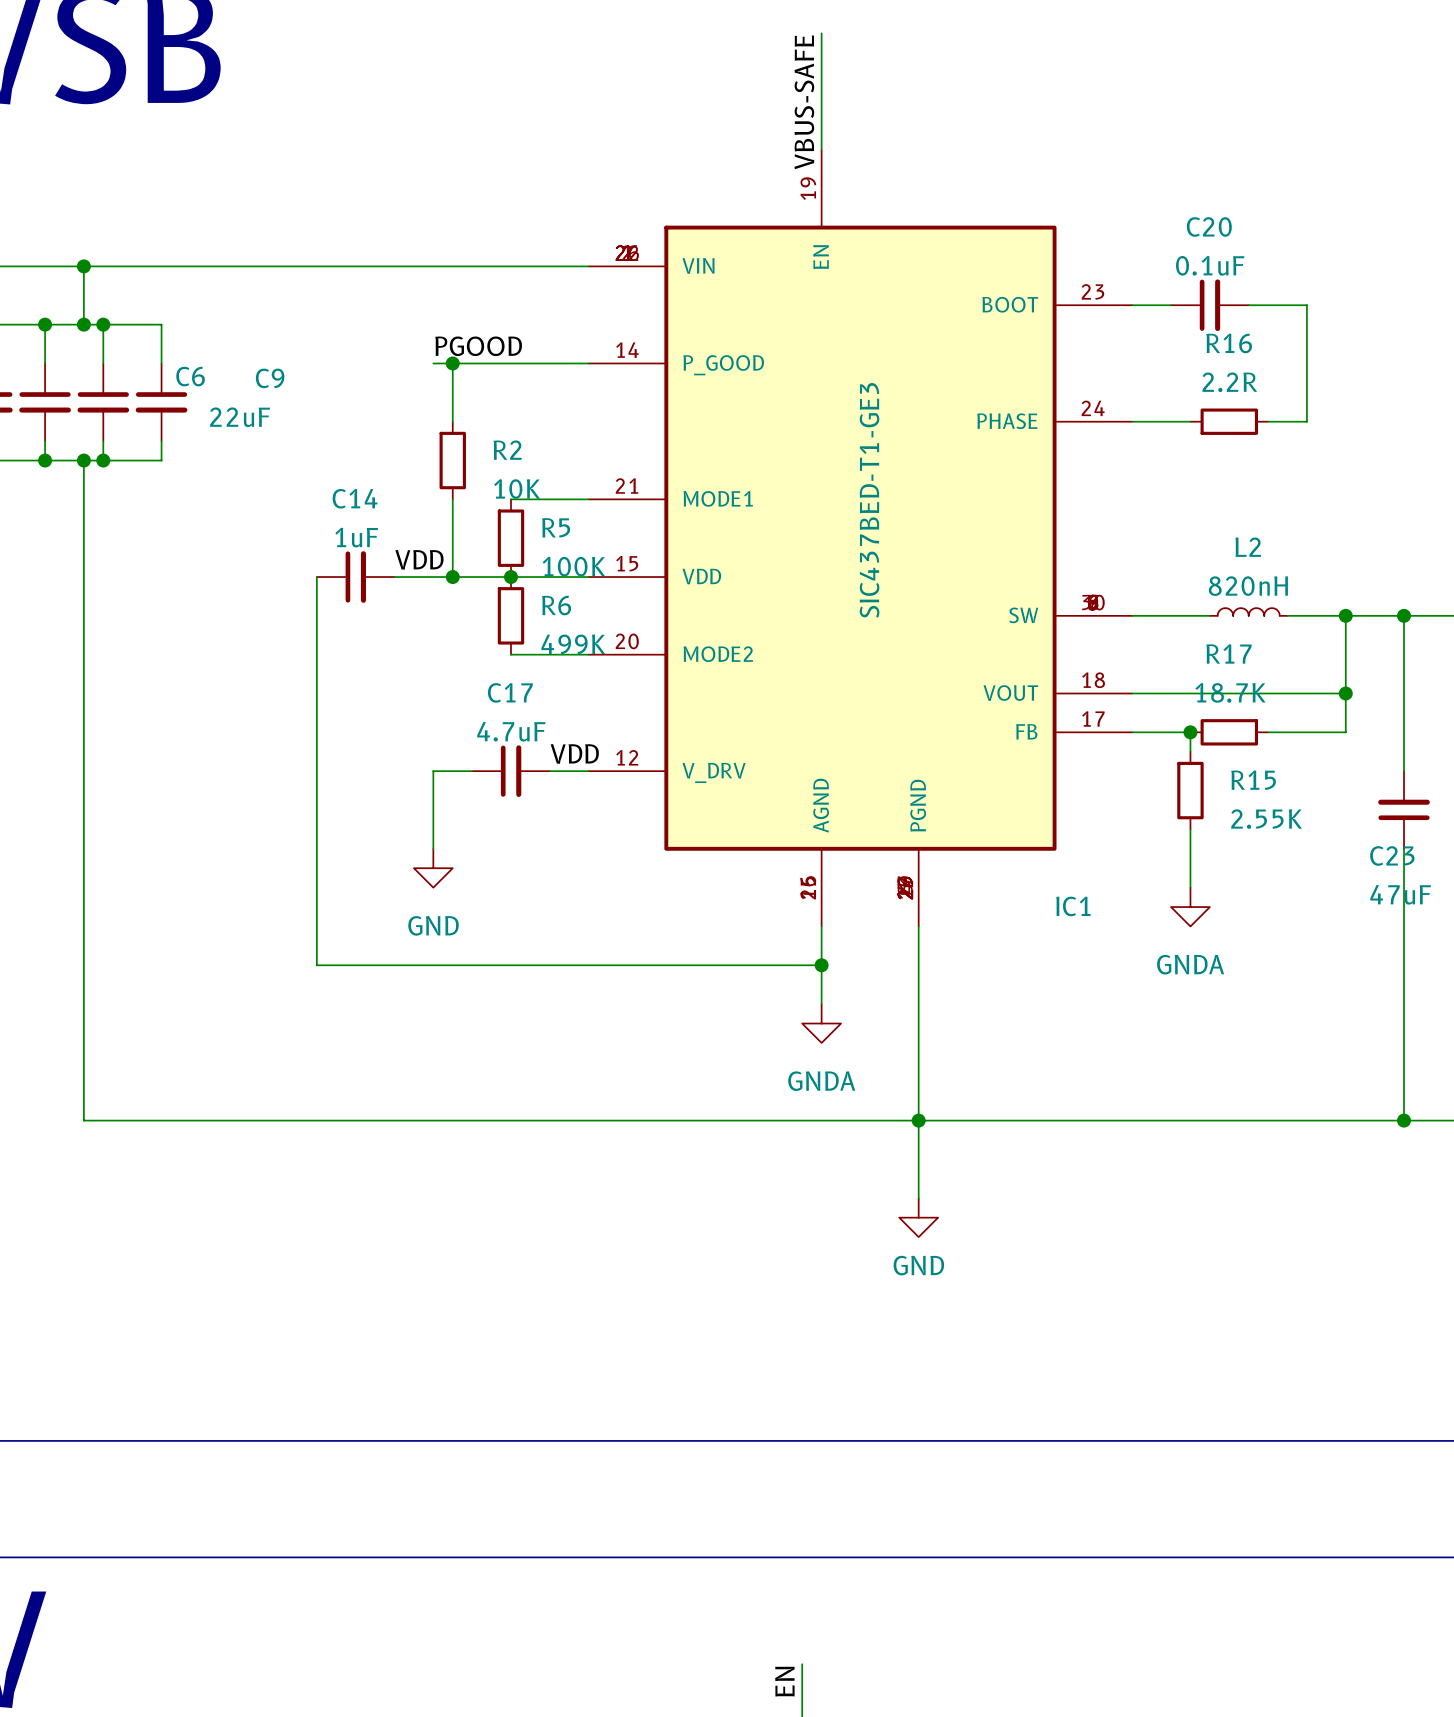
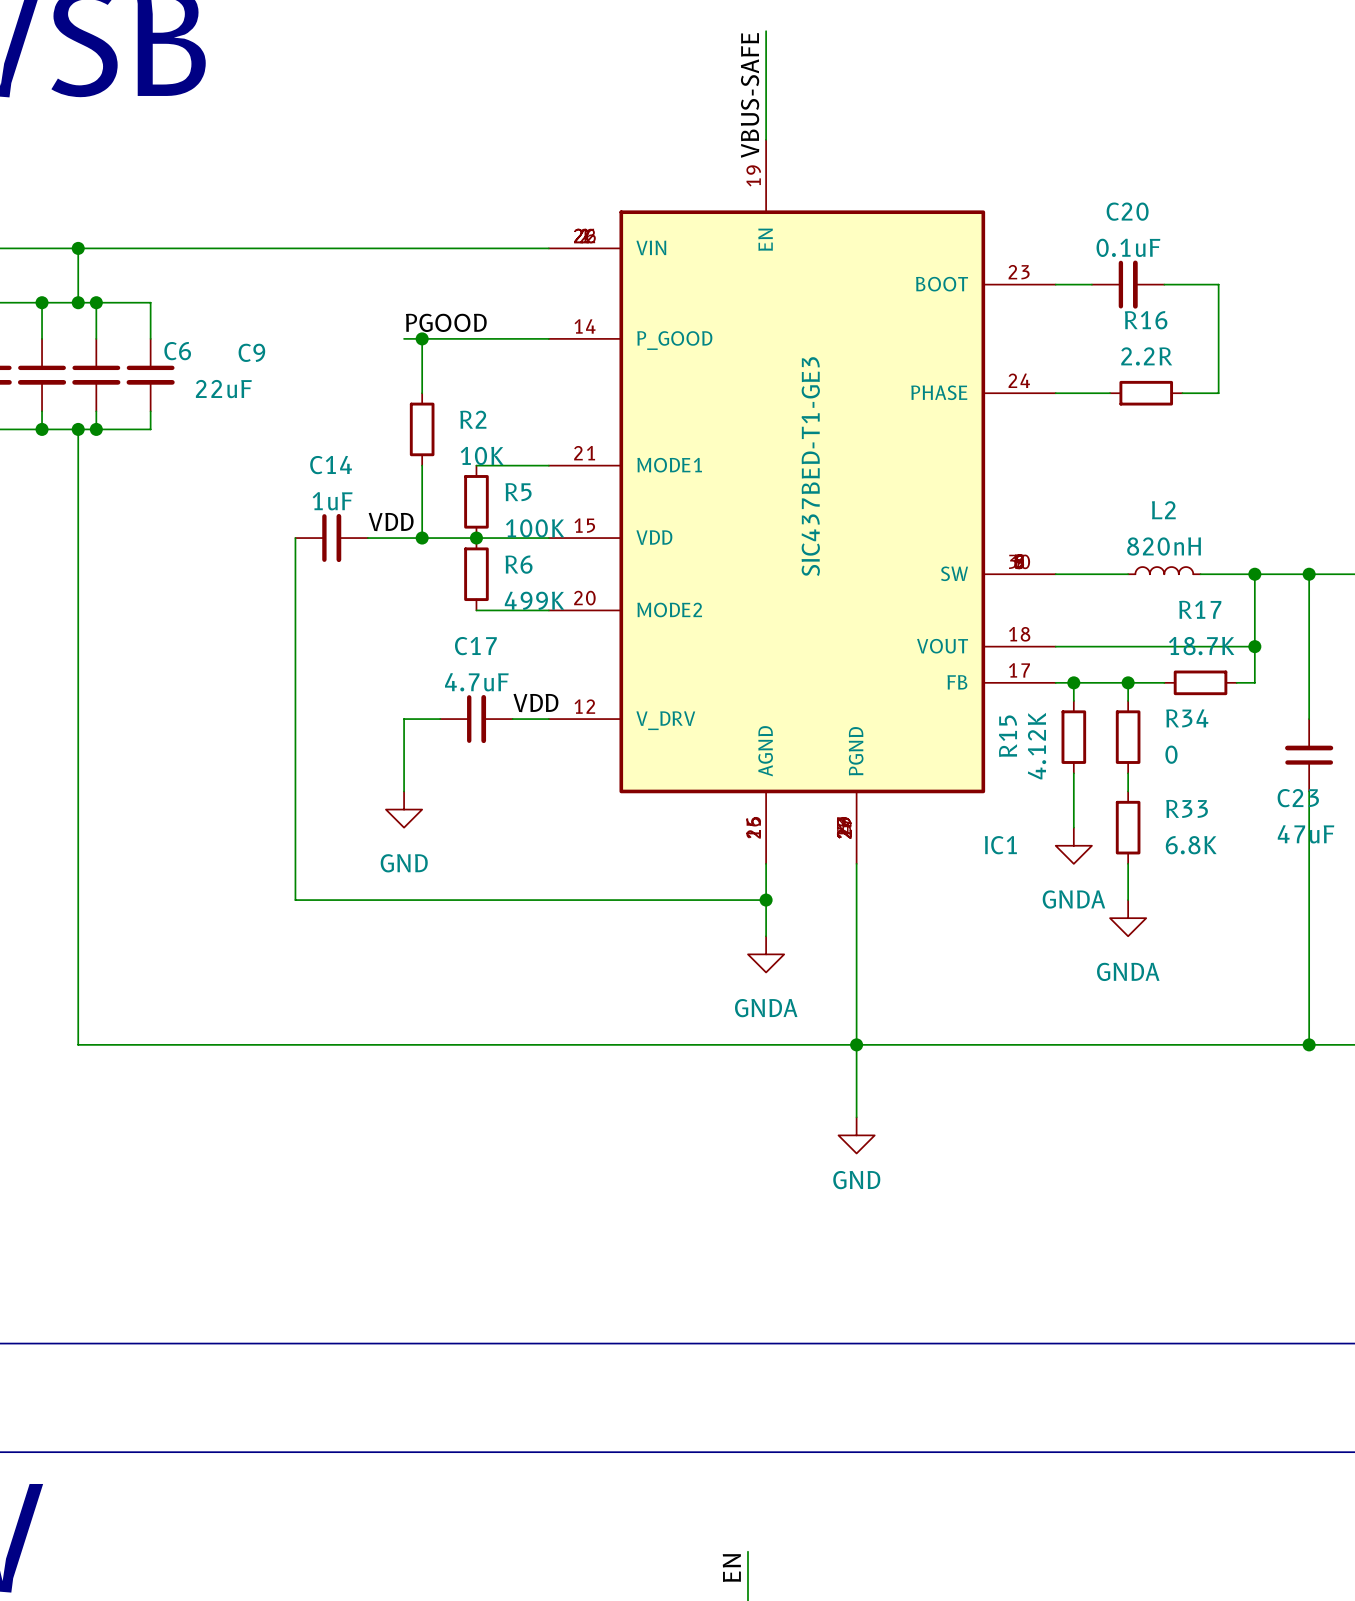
wire: none -> (1073, 682) (1073, 700)
junction: none -> (1073, 682)
wire: (1190, 732) (1190, 751) -> (1110, 682) (1164, 682)
junction: (1190, 732) -> none
wire: none -> (1128, 682) (1128, 700)
junction: none -> (1128, 682)
R17 position: (1229, 732) -> (1200, 682)
wire: (1268, 732) (1326, 732) -> none
R15 name rotation: 0° (1253, 780) -> 90° counterclockwise (1007, 736)
R15 name position: R15 (1253, 780) -> R15 (1007, 736)
R15 position: (1190, 790) -> (1073, 737)
R34: none -> 0 (1128, 737)
R15 value: 2.55K (1266, 819) -> 4.12K (1037, 746)
wire: (1190, 829) (1190, 887) -> (1073, 773) (1073, 827)
wire: none -> (1128, 773) (1128, 791)
R33: none -> 6.8K (1128, 827)
power symbol position: GNDA (1190, 907) -> GNDA (1073, 845)
wire: none -> (1128, 863) (1128, 900)
power symbol: none -> GNDA (1128, 918)

